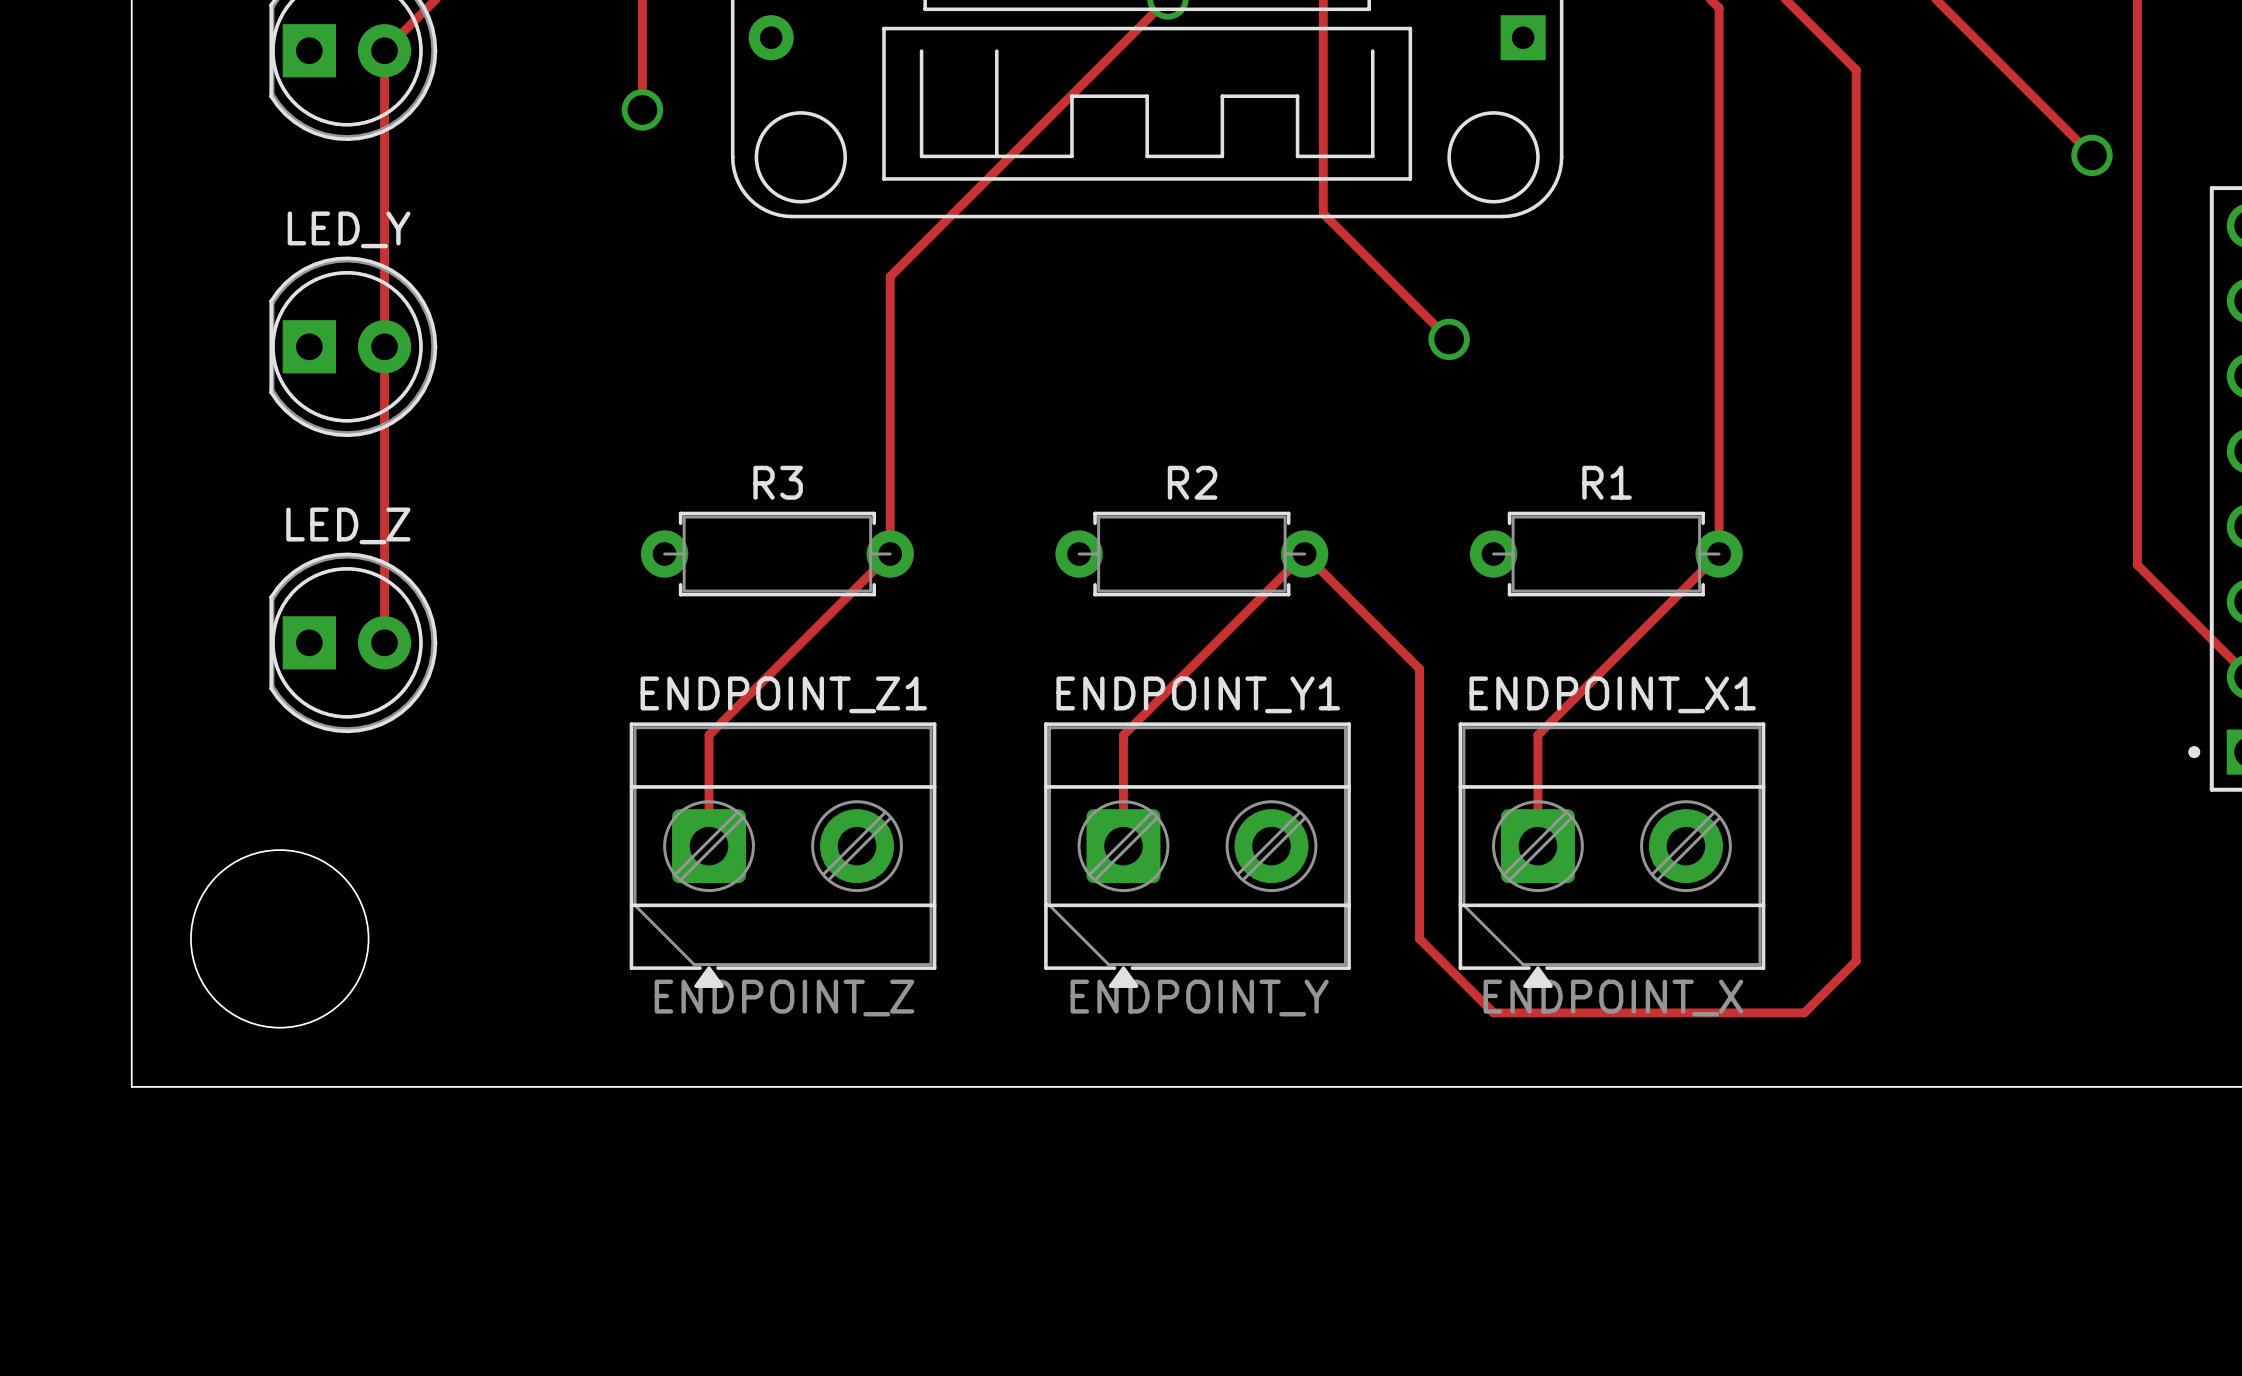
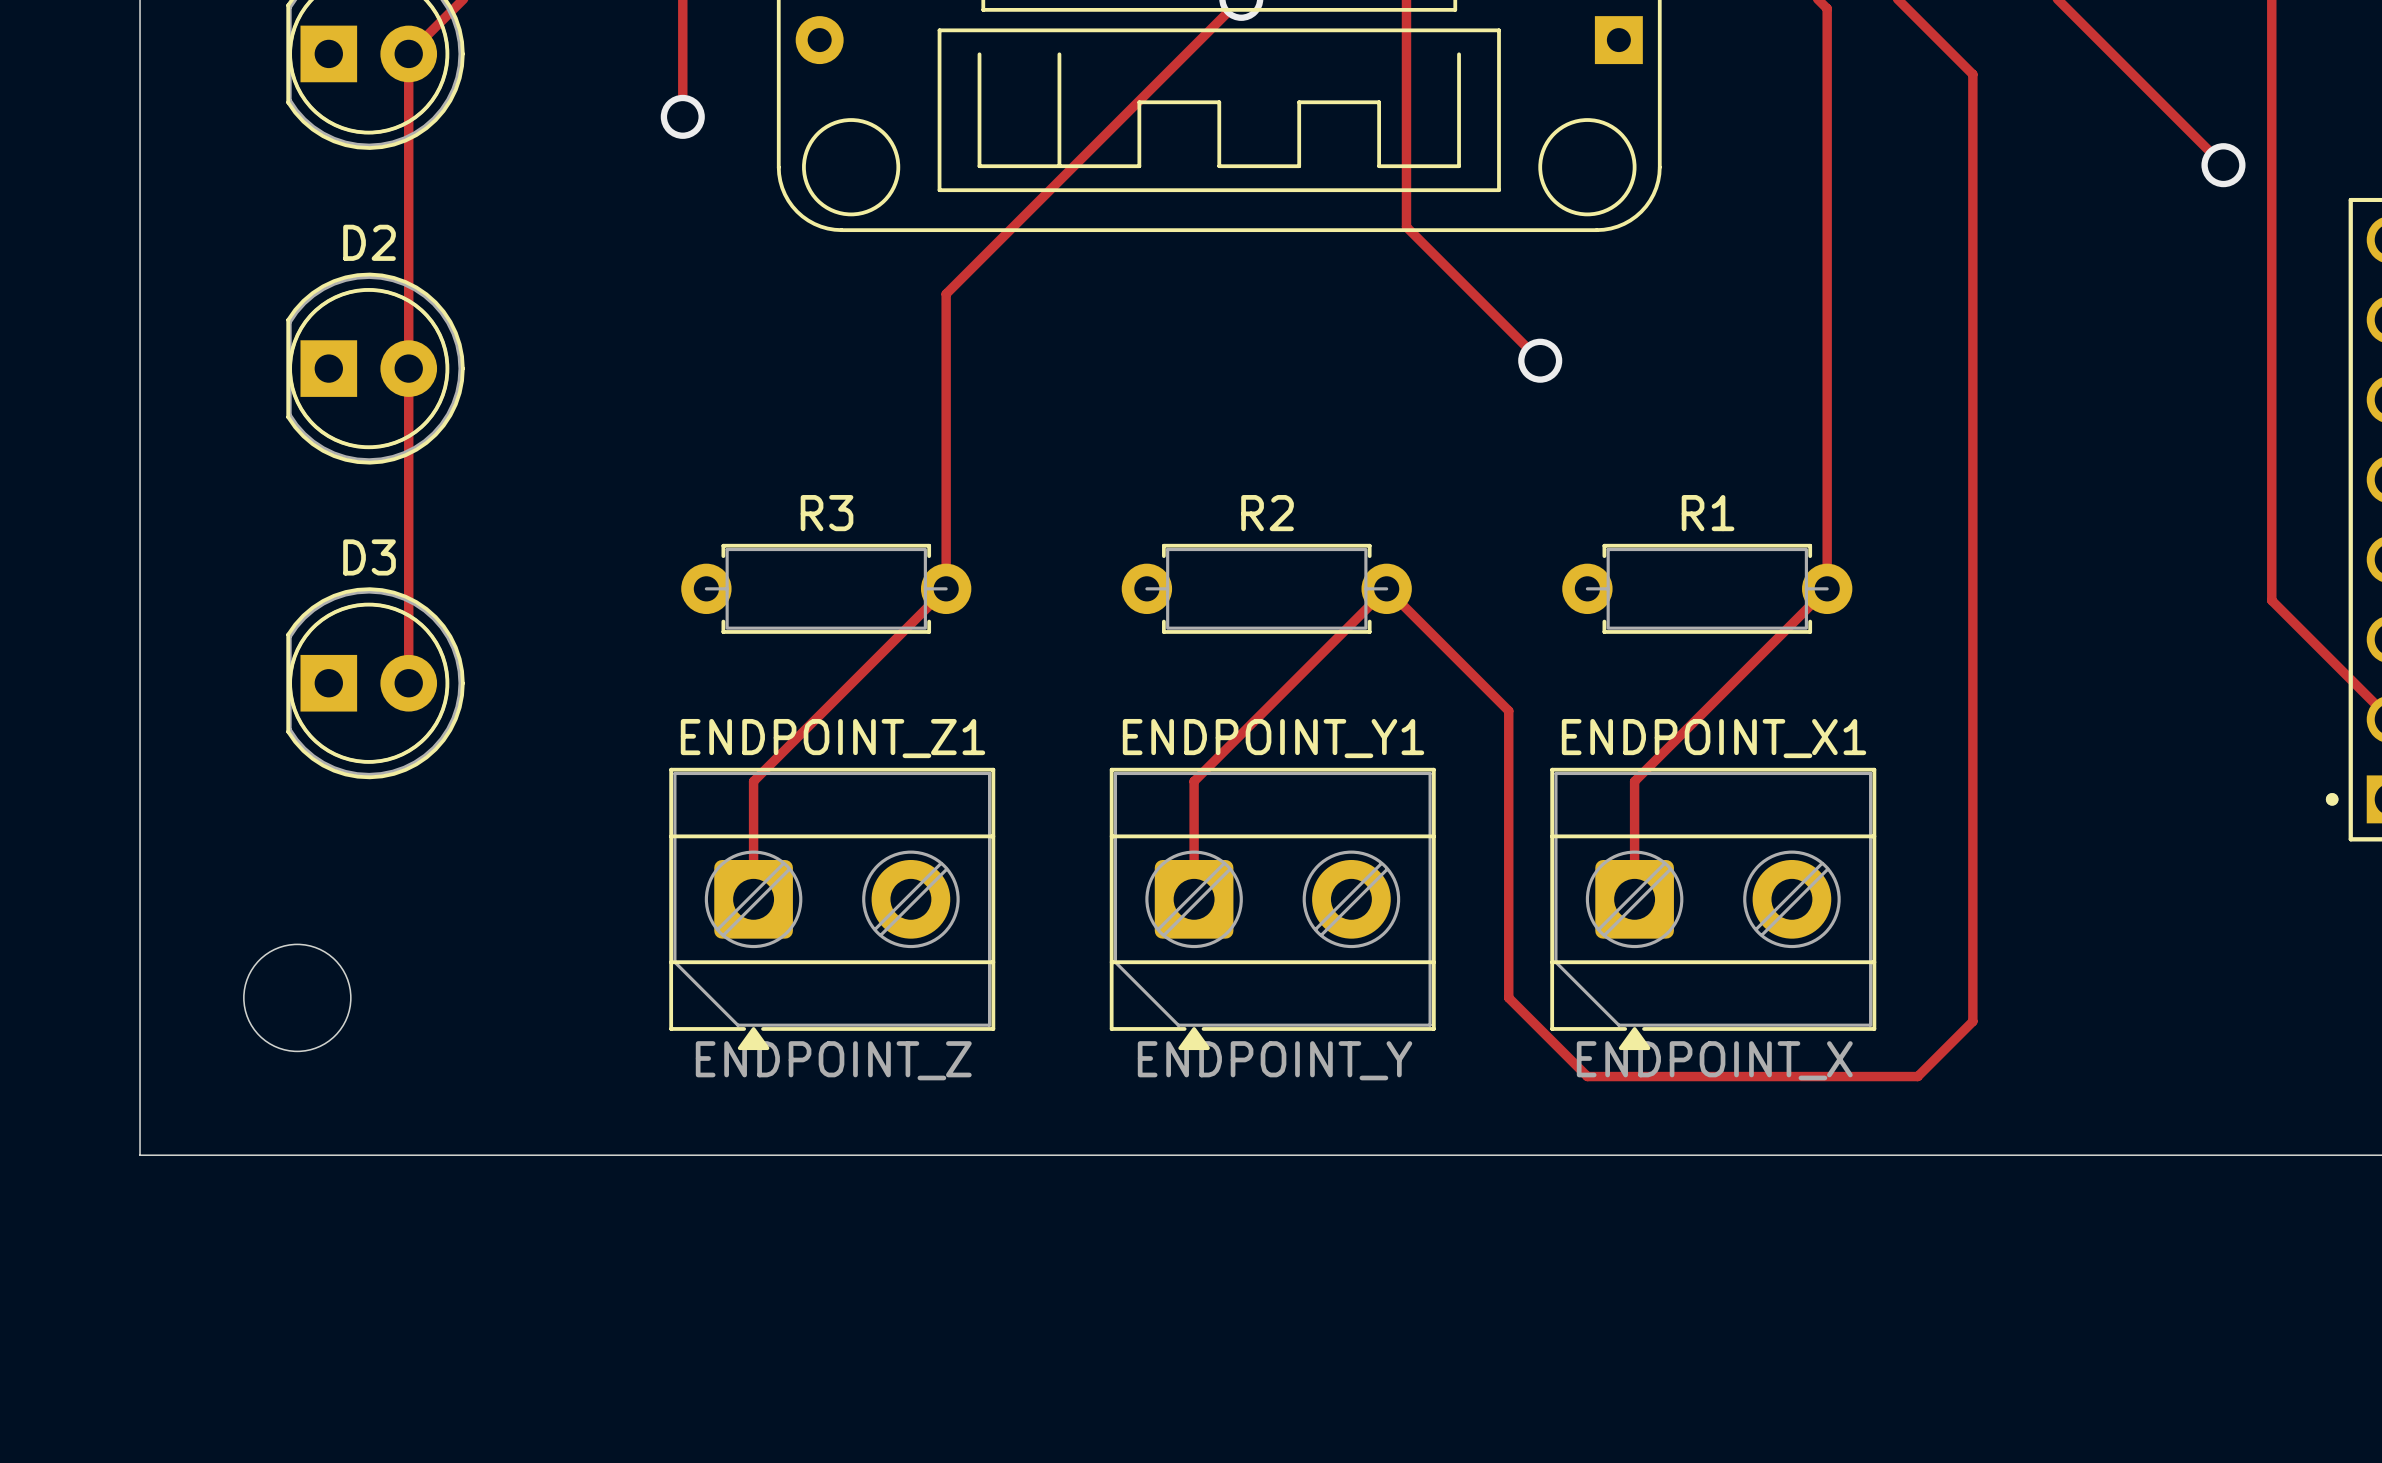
LED_Y name: LED_Y (349, 229) -> D2 (369, 242)
LED_Z name: LED_Z (348, 525) -> D3 (369, 557)
round board edge size: [190, 849, 370, 1029] -> [243, 943, 352, 1053]

